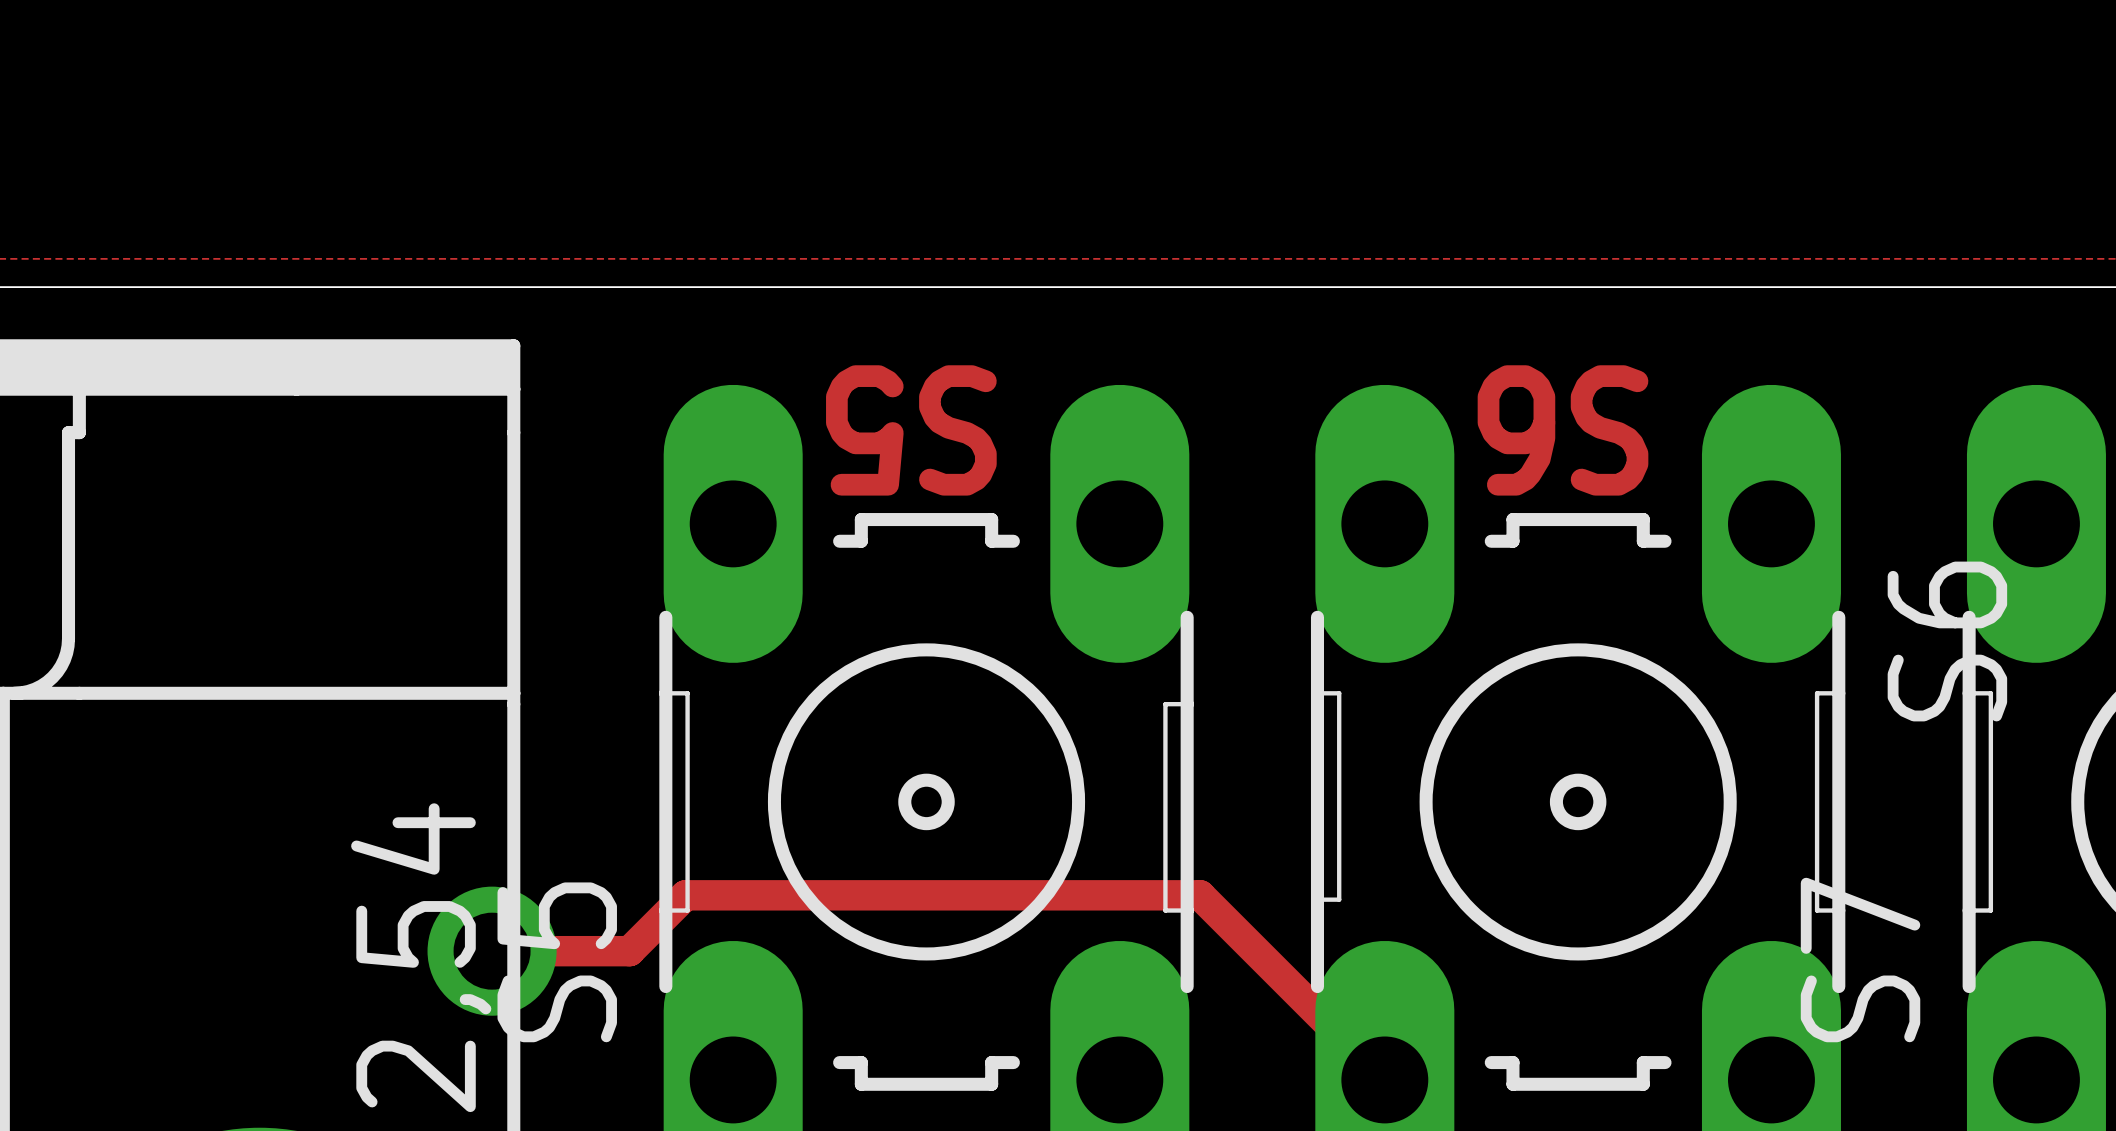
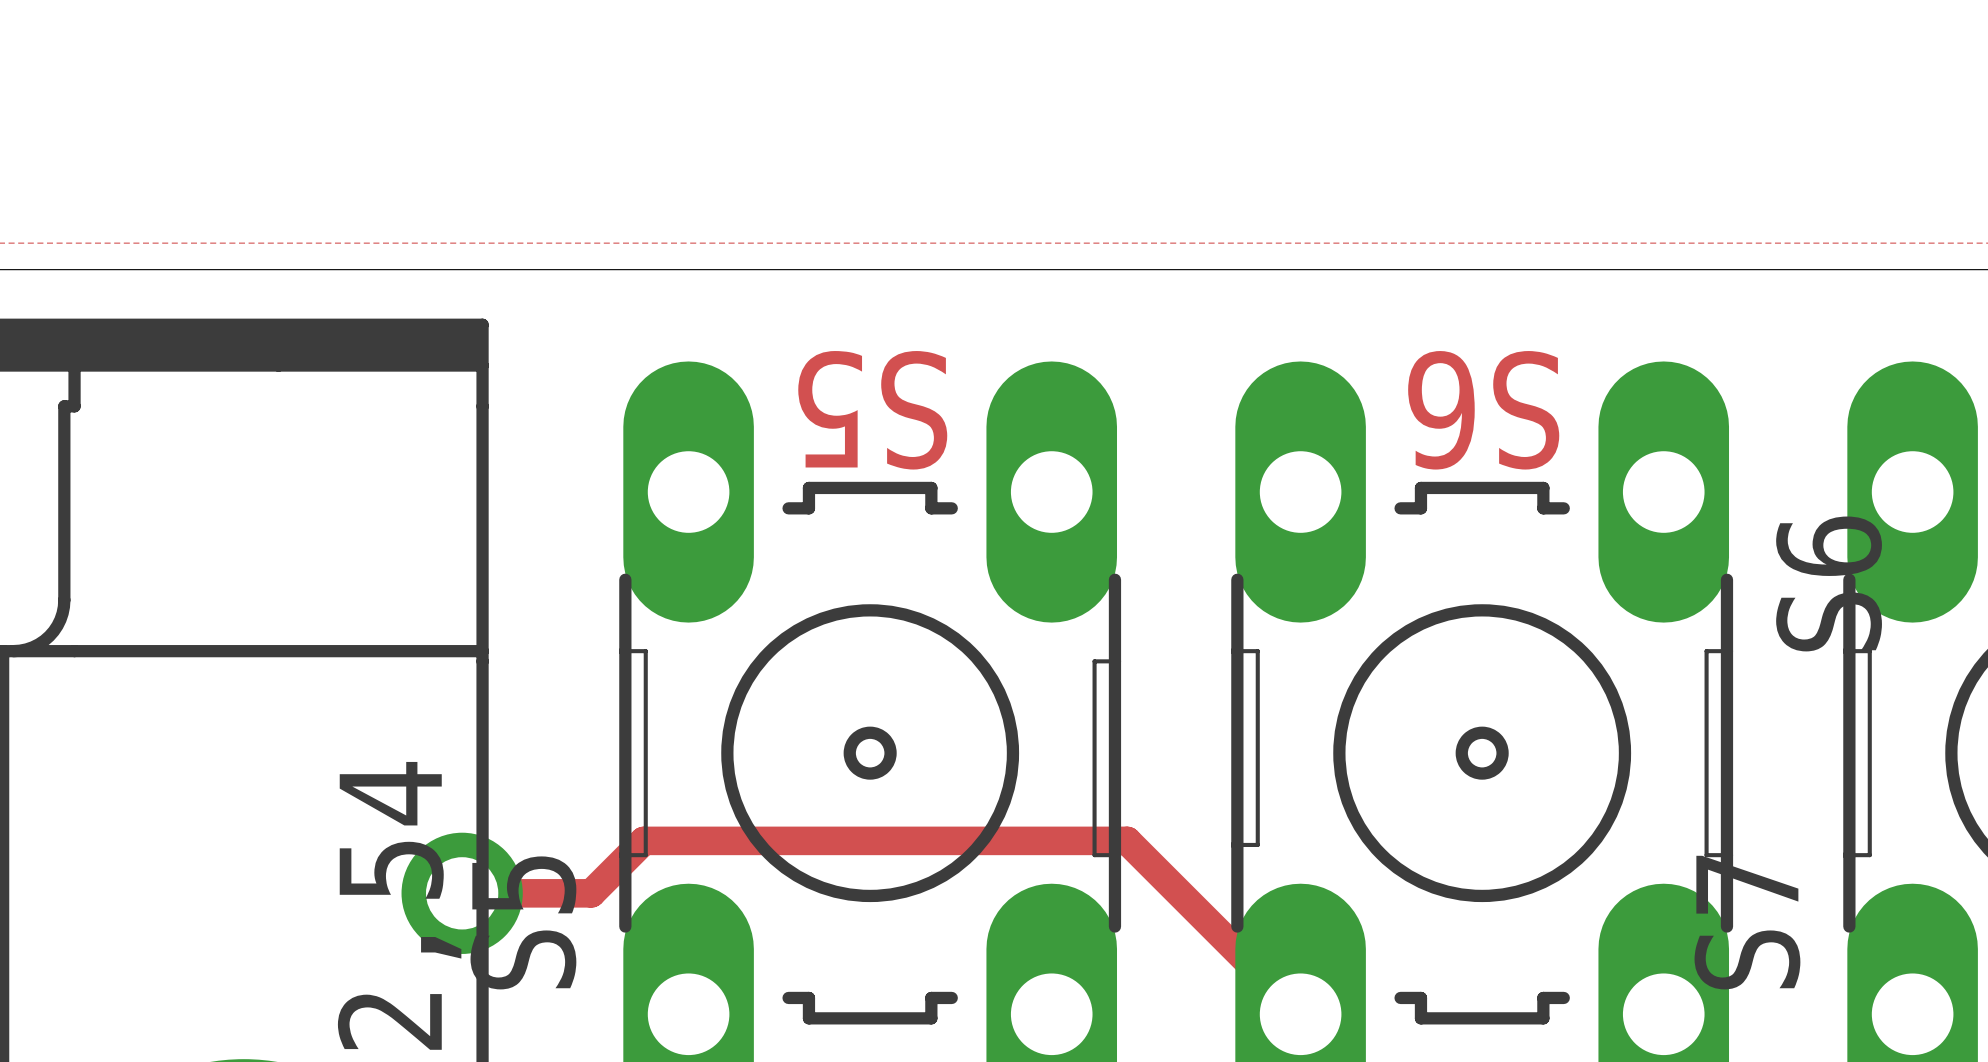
text position: S5 (911, 430) -> S5 (872, 410)
text position: S6 (1563, 430) -> S6 (1483, 410)

